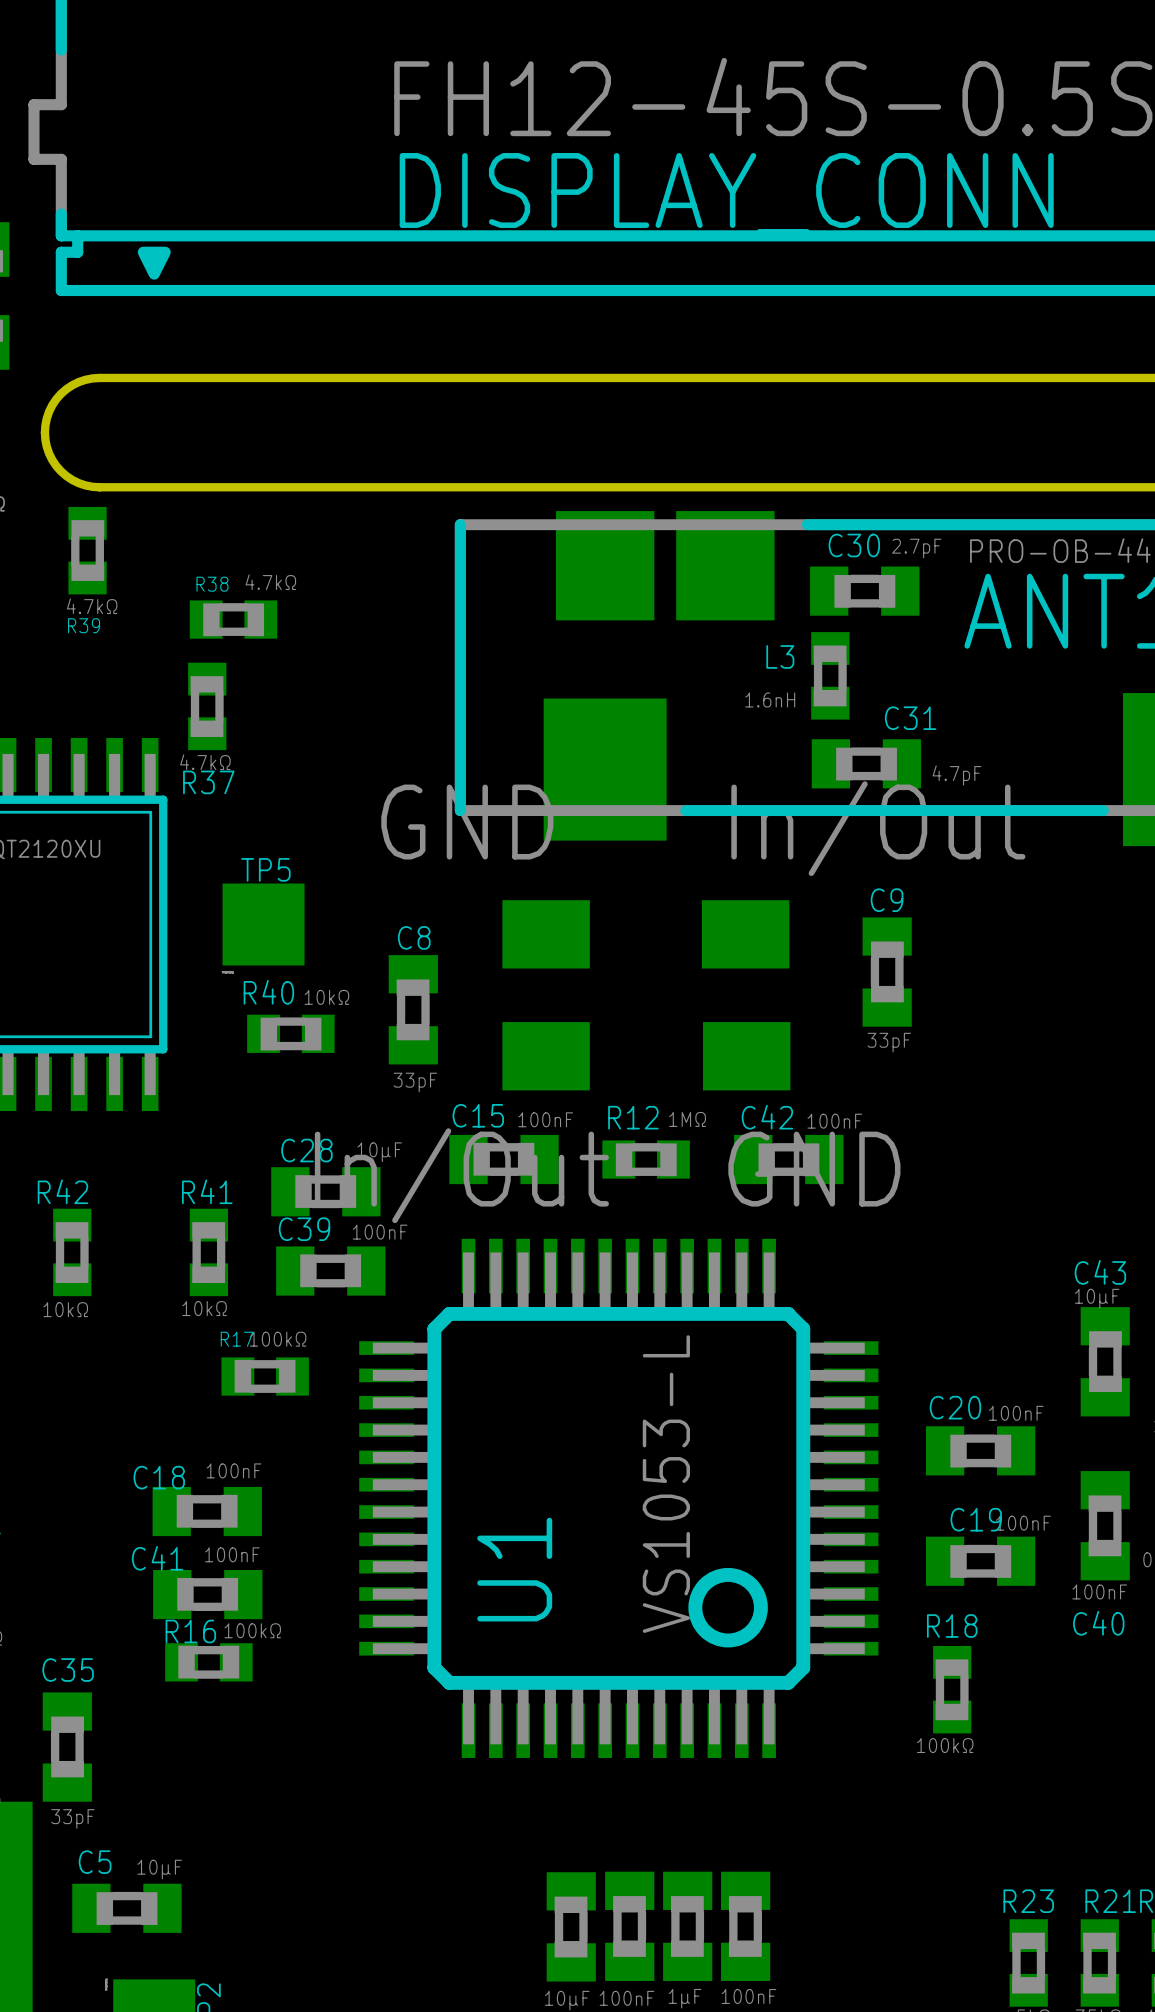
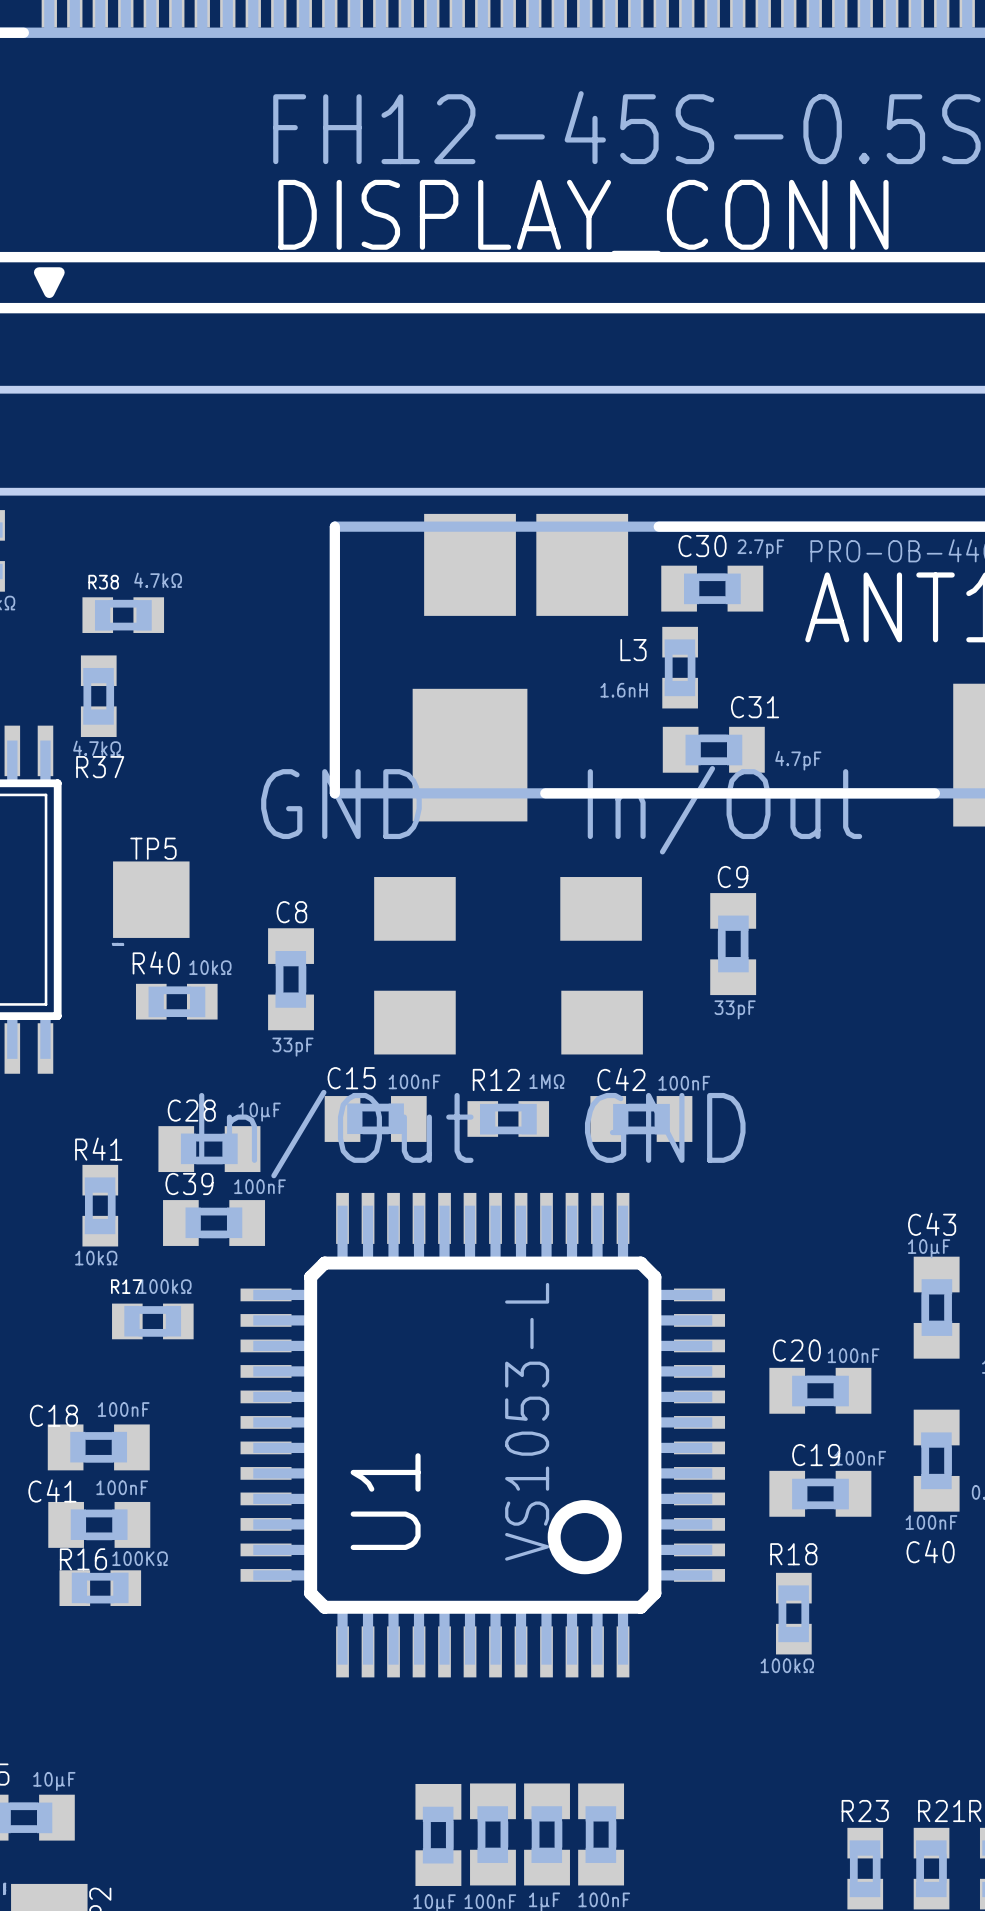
R16 value: 100kΩ (252, 1630) -> 100KΩ (140, 1558)

